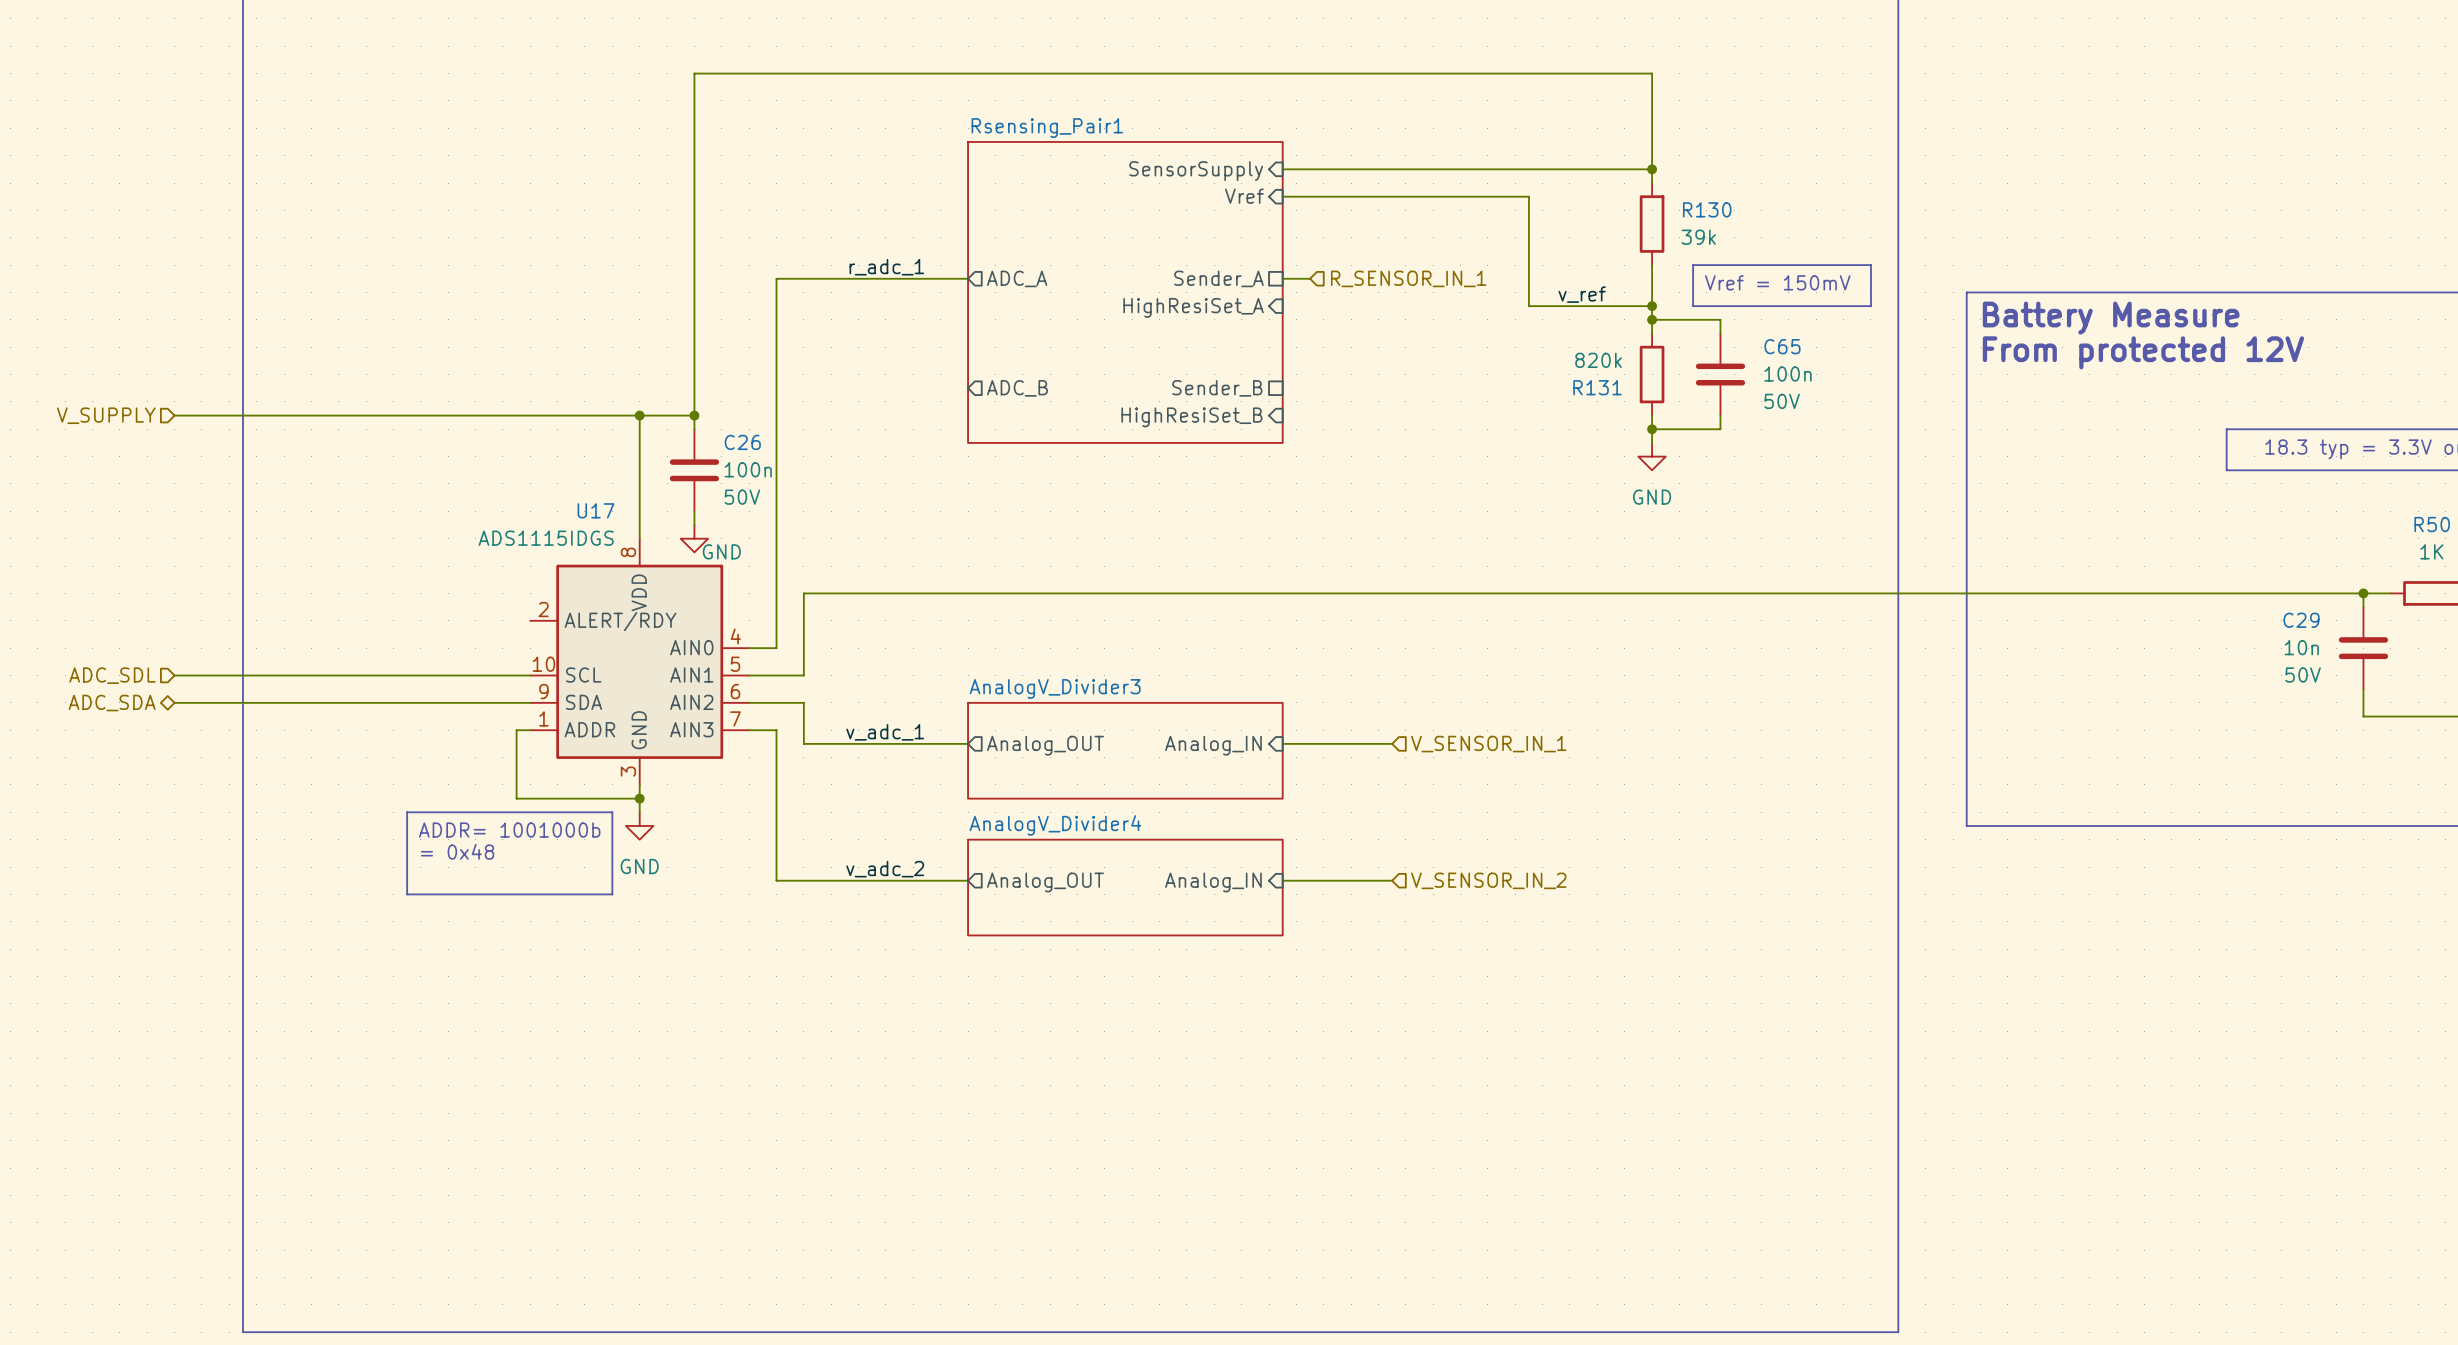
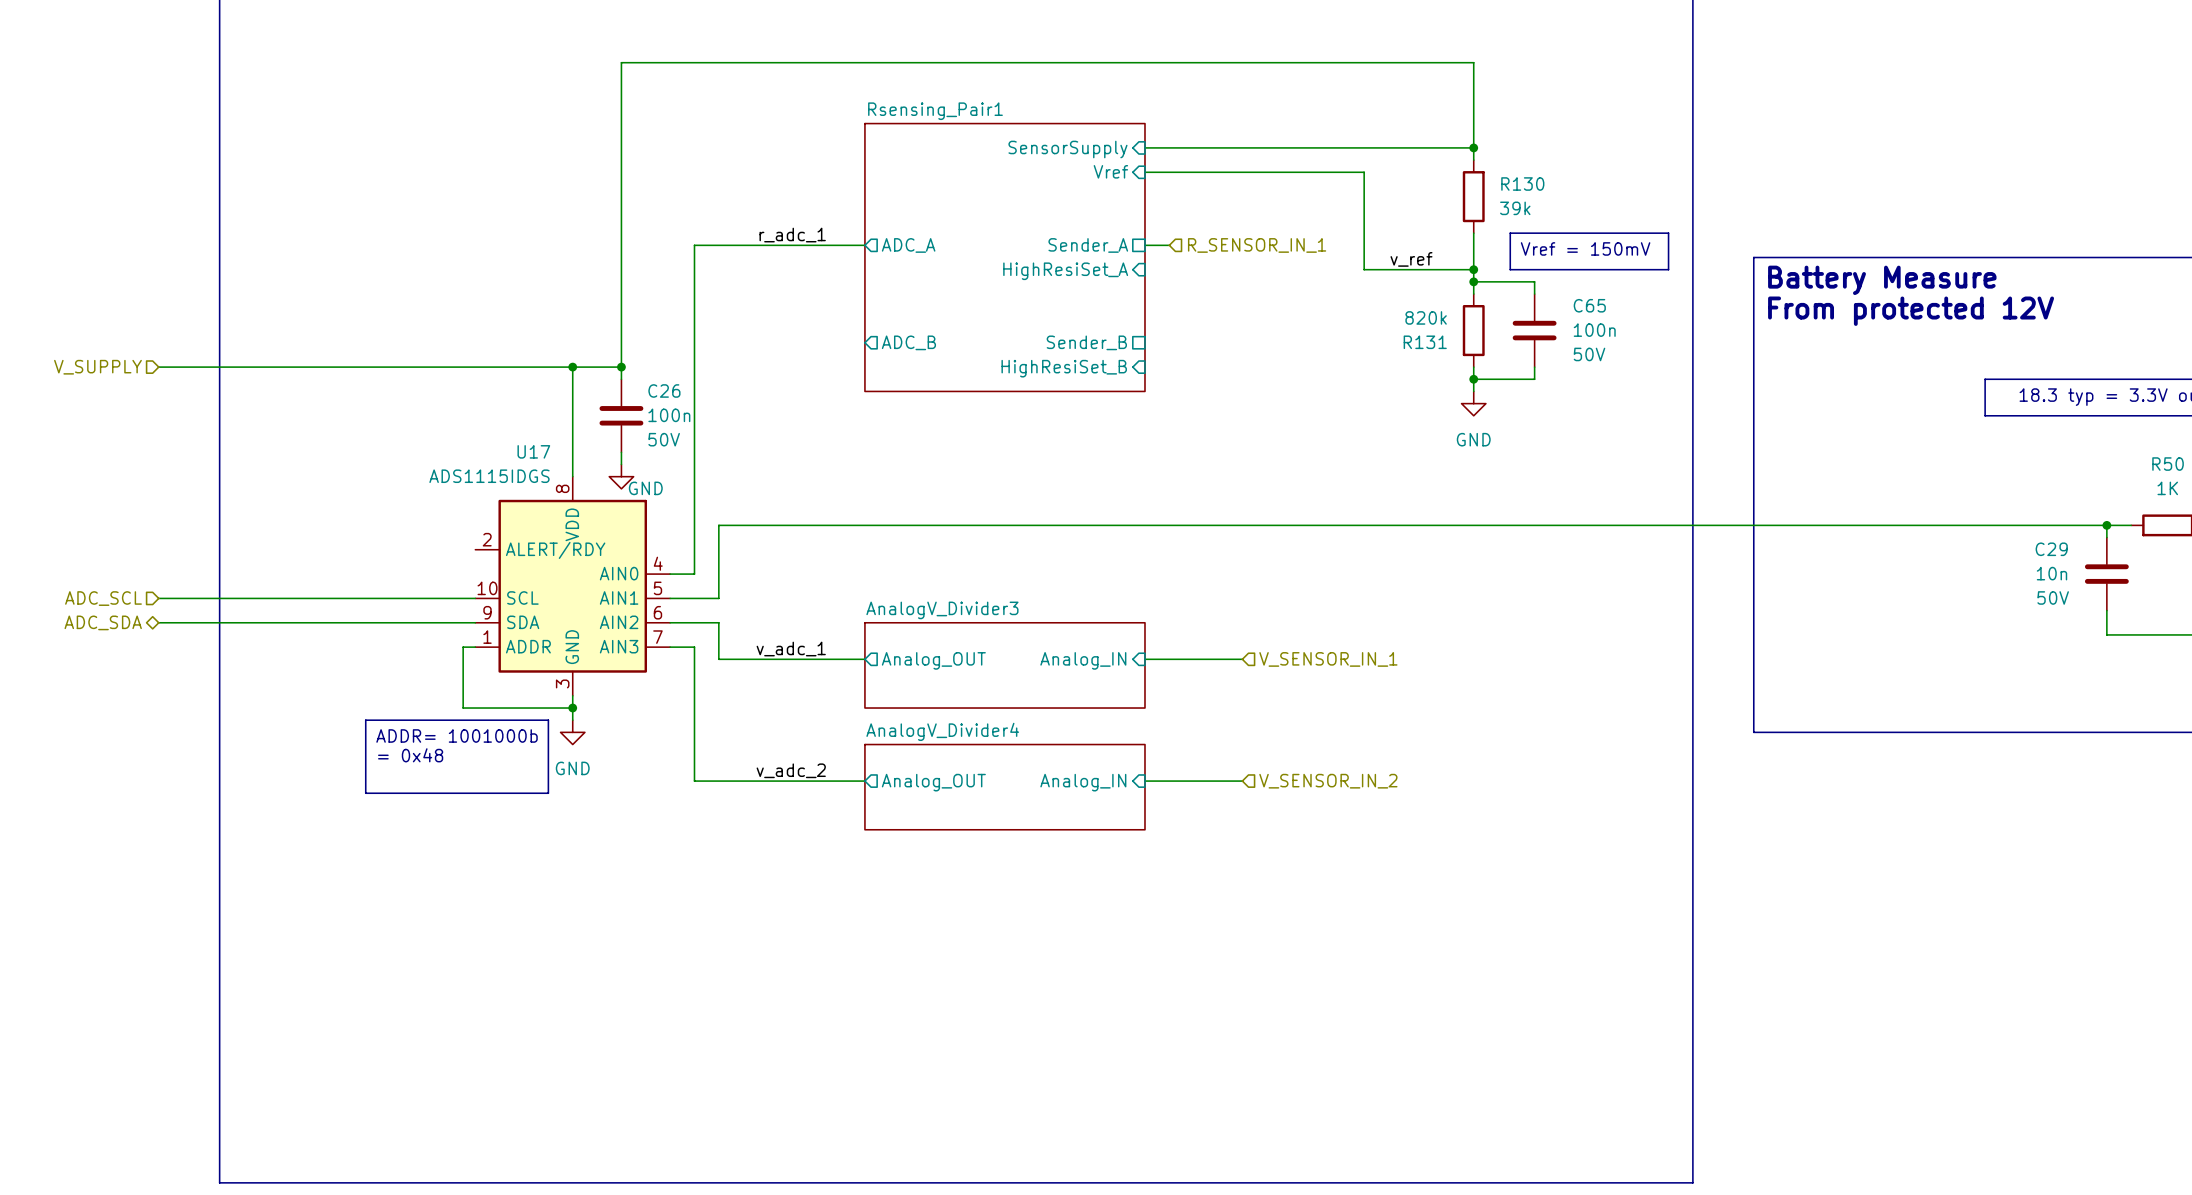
hierarchical label: ADC_SDL (112, 675) -> ADC_SCL (103, 598)

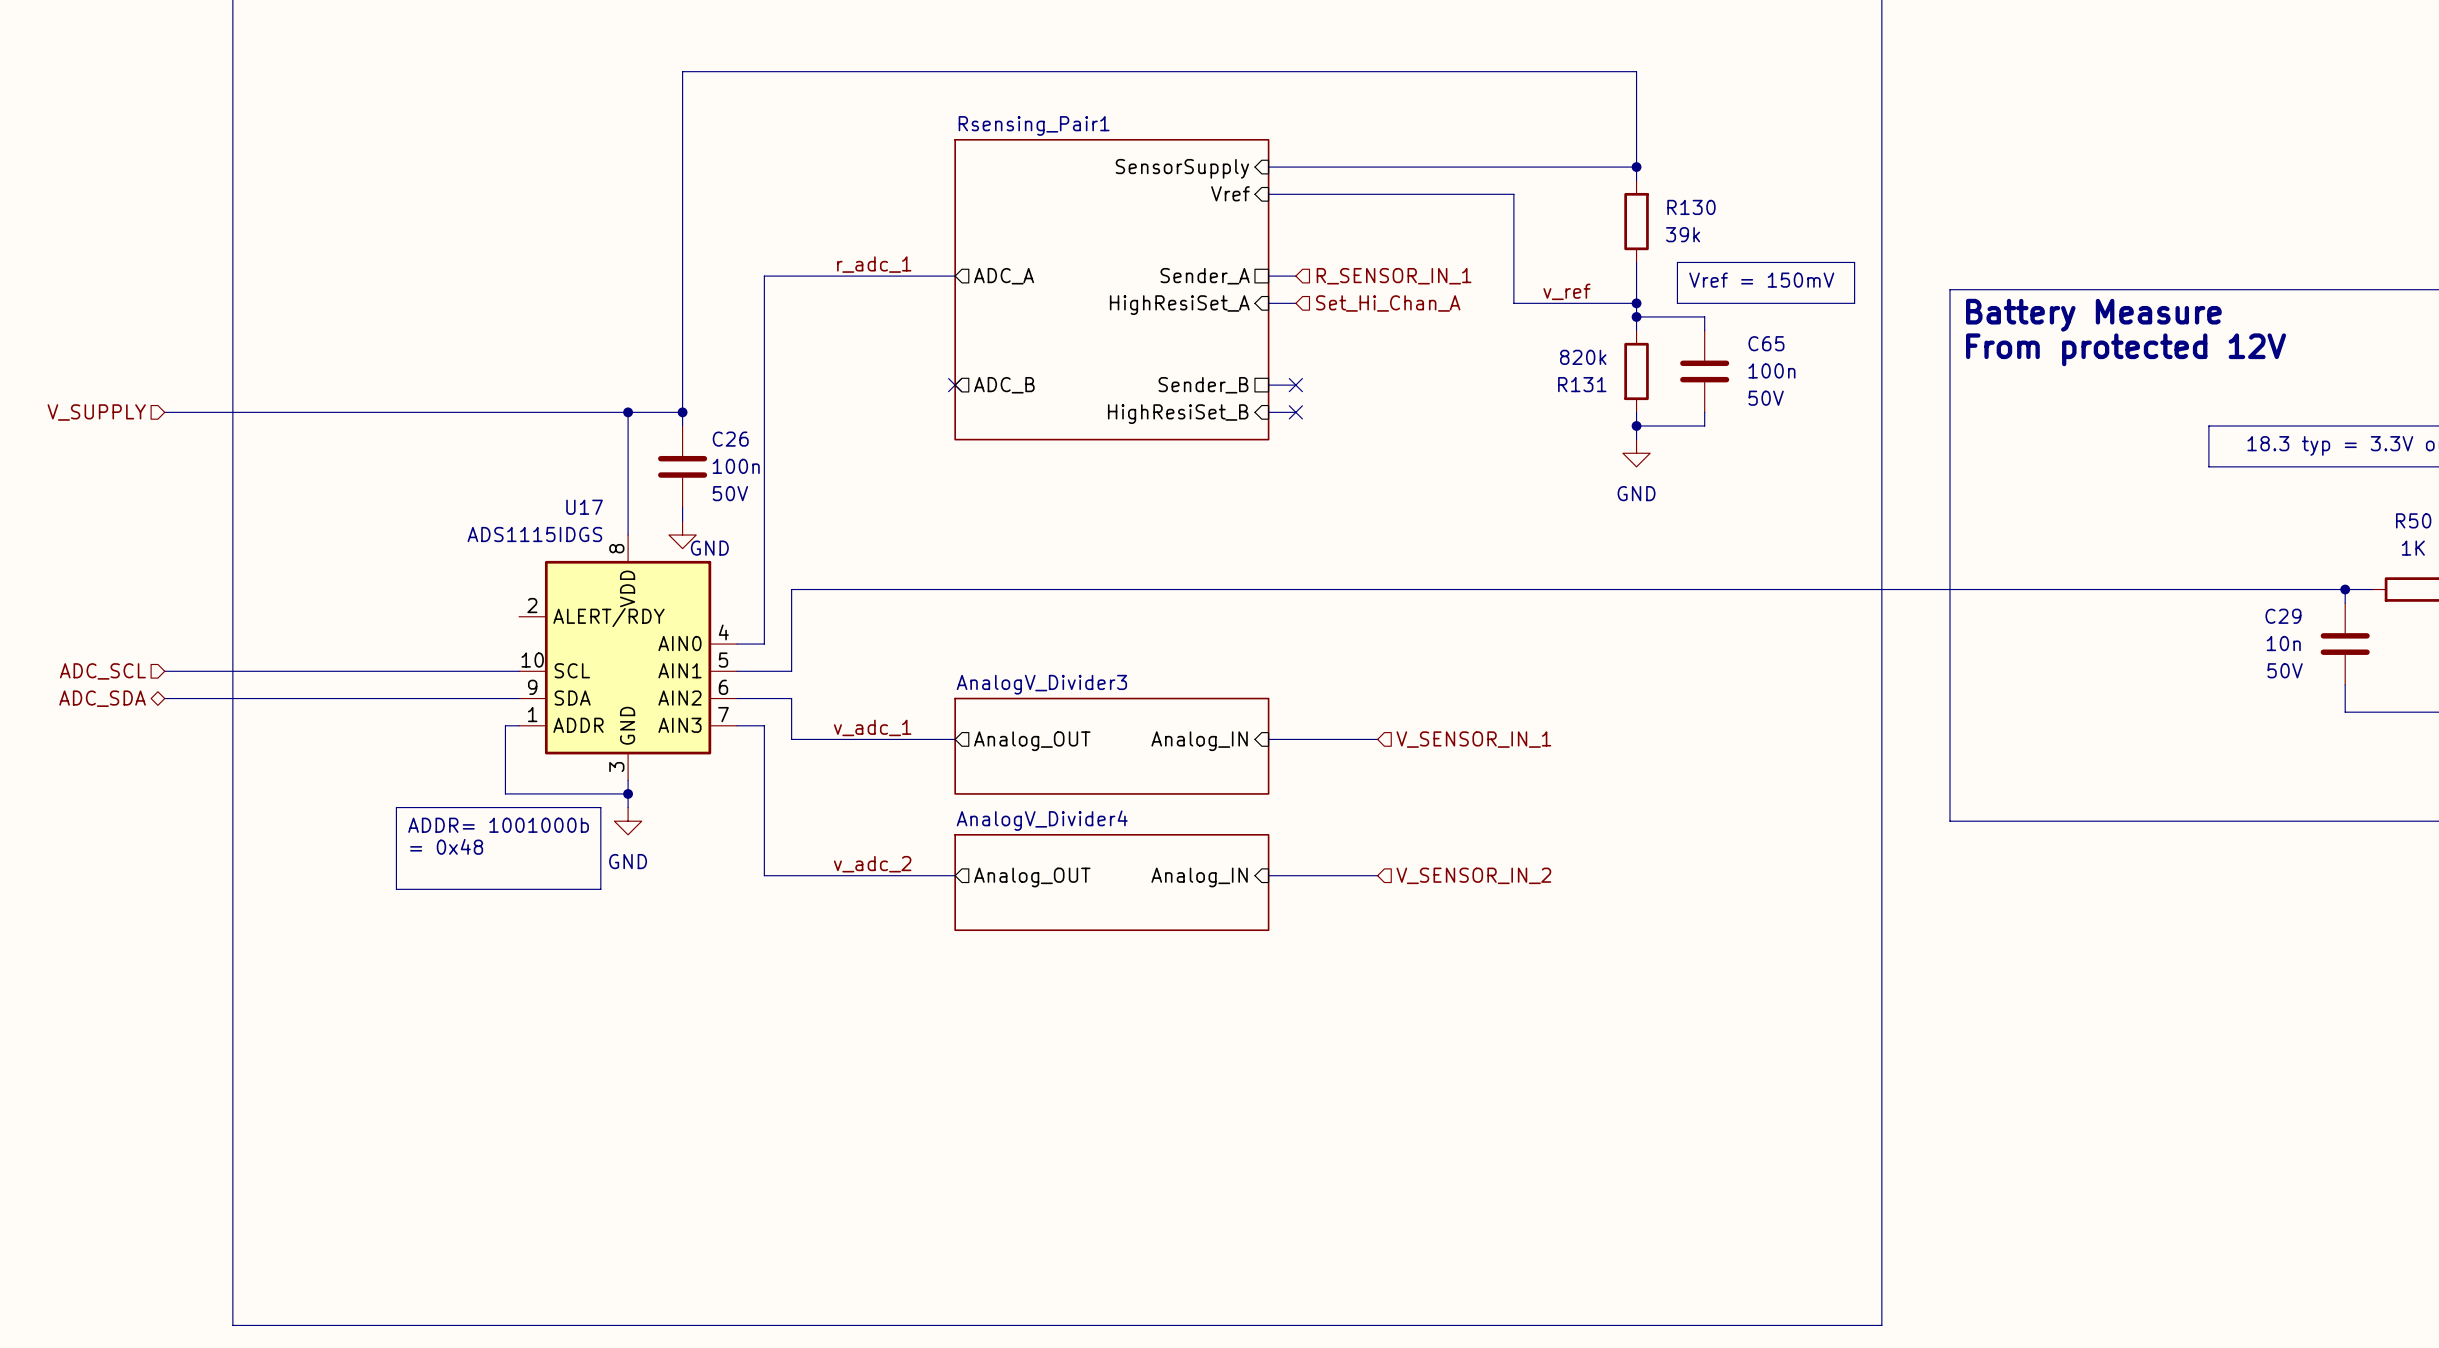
wire: none -> (1268, 303) (1295, 303)
hierarchical label: none -> Set_Hi_Chan_A (1388, 303)
no-connect mark: none -> (955, 385)
wire: none -> (1268, 385) (1295, 385)
no-connect mark: none -> (1295, 385)
wire: none -> (1268, 412) (1295, 412)
no-connect mark: none -> (1295, 412)

